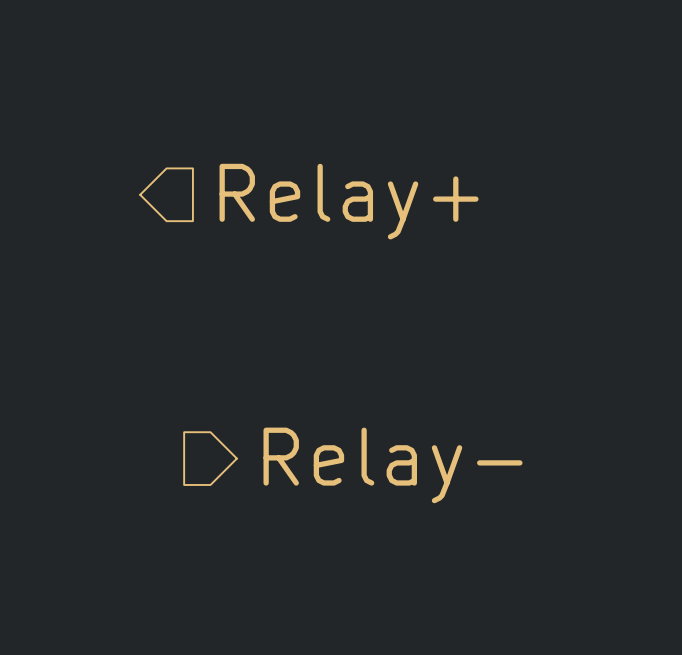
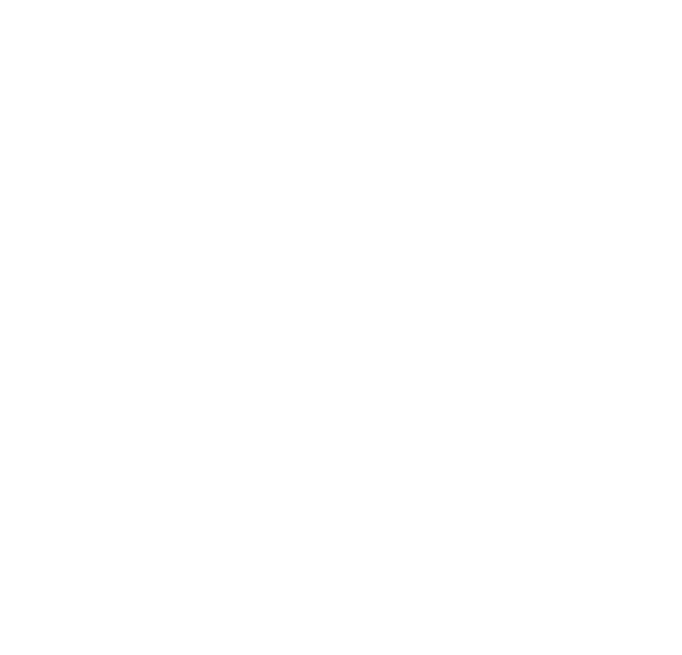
hierarchical label: Relay+ (349, 201) -> none
hierarchical label: Relay- (393, 465) -> none

